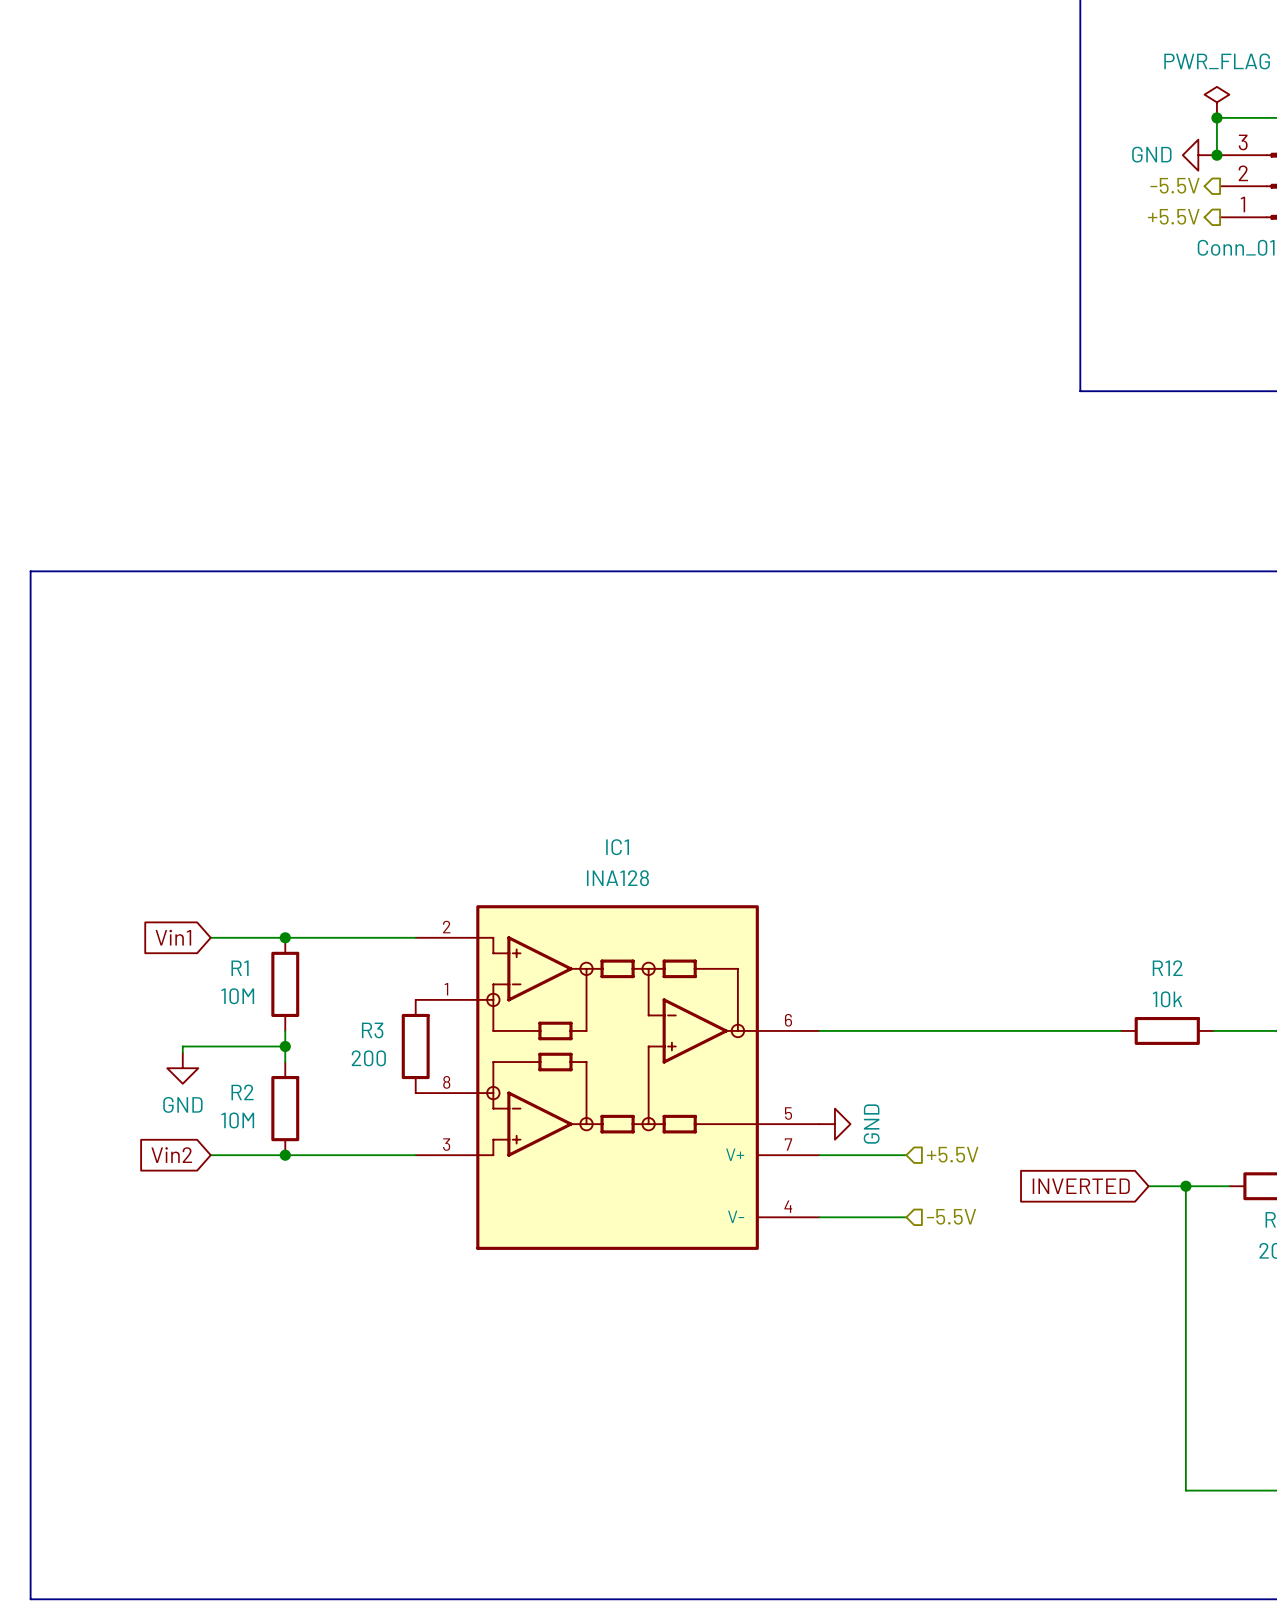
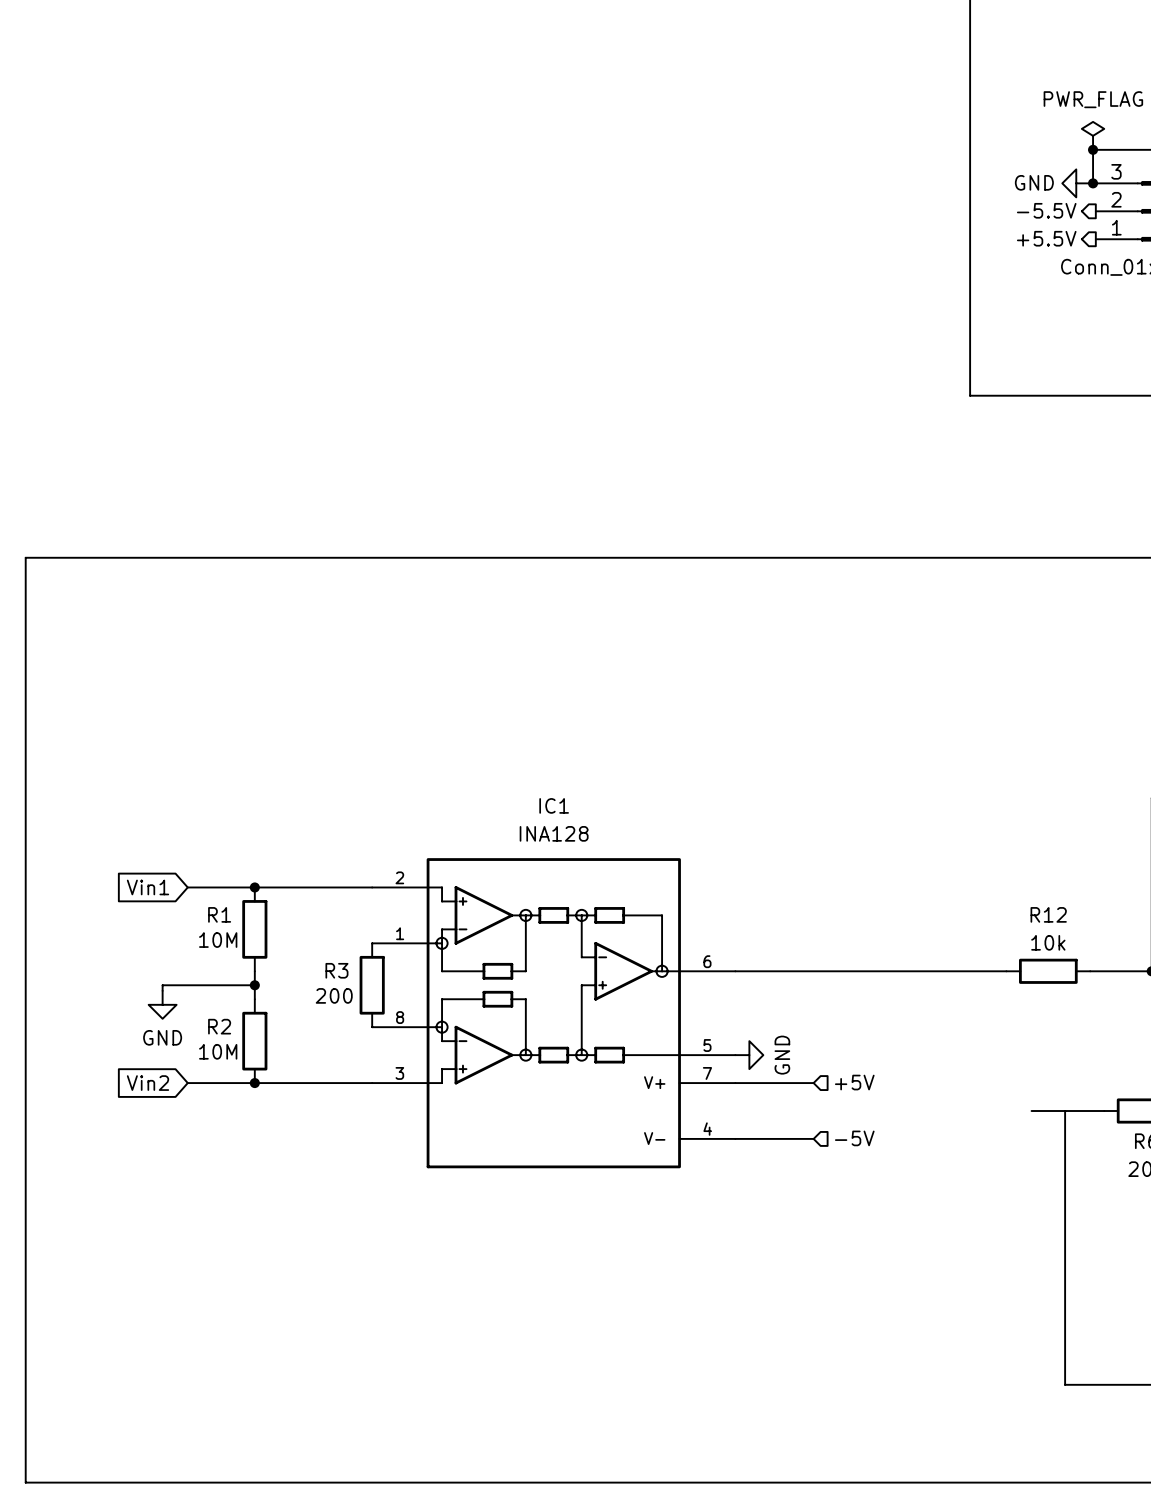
hierarchical label: +5.5V (952, 1154) -> +5V (854, 1082)
global label: INVERTED (1081, 1186) -> none
junction: (1185, 1186) -> none
hierarchical label: -5.5V (951, 1216) -> -5V (854, 1138)

